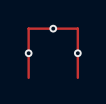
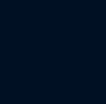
via: (53, 28) -> none
via: (28, 53) -> none
via: (77, 53) -> none
track: (28, 77) (28, 28) (77, 28) (77, 77) -> none

